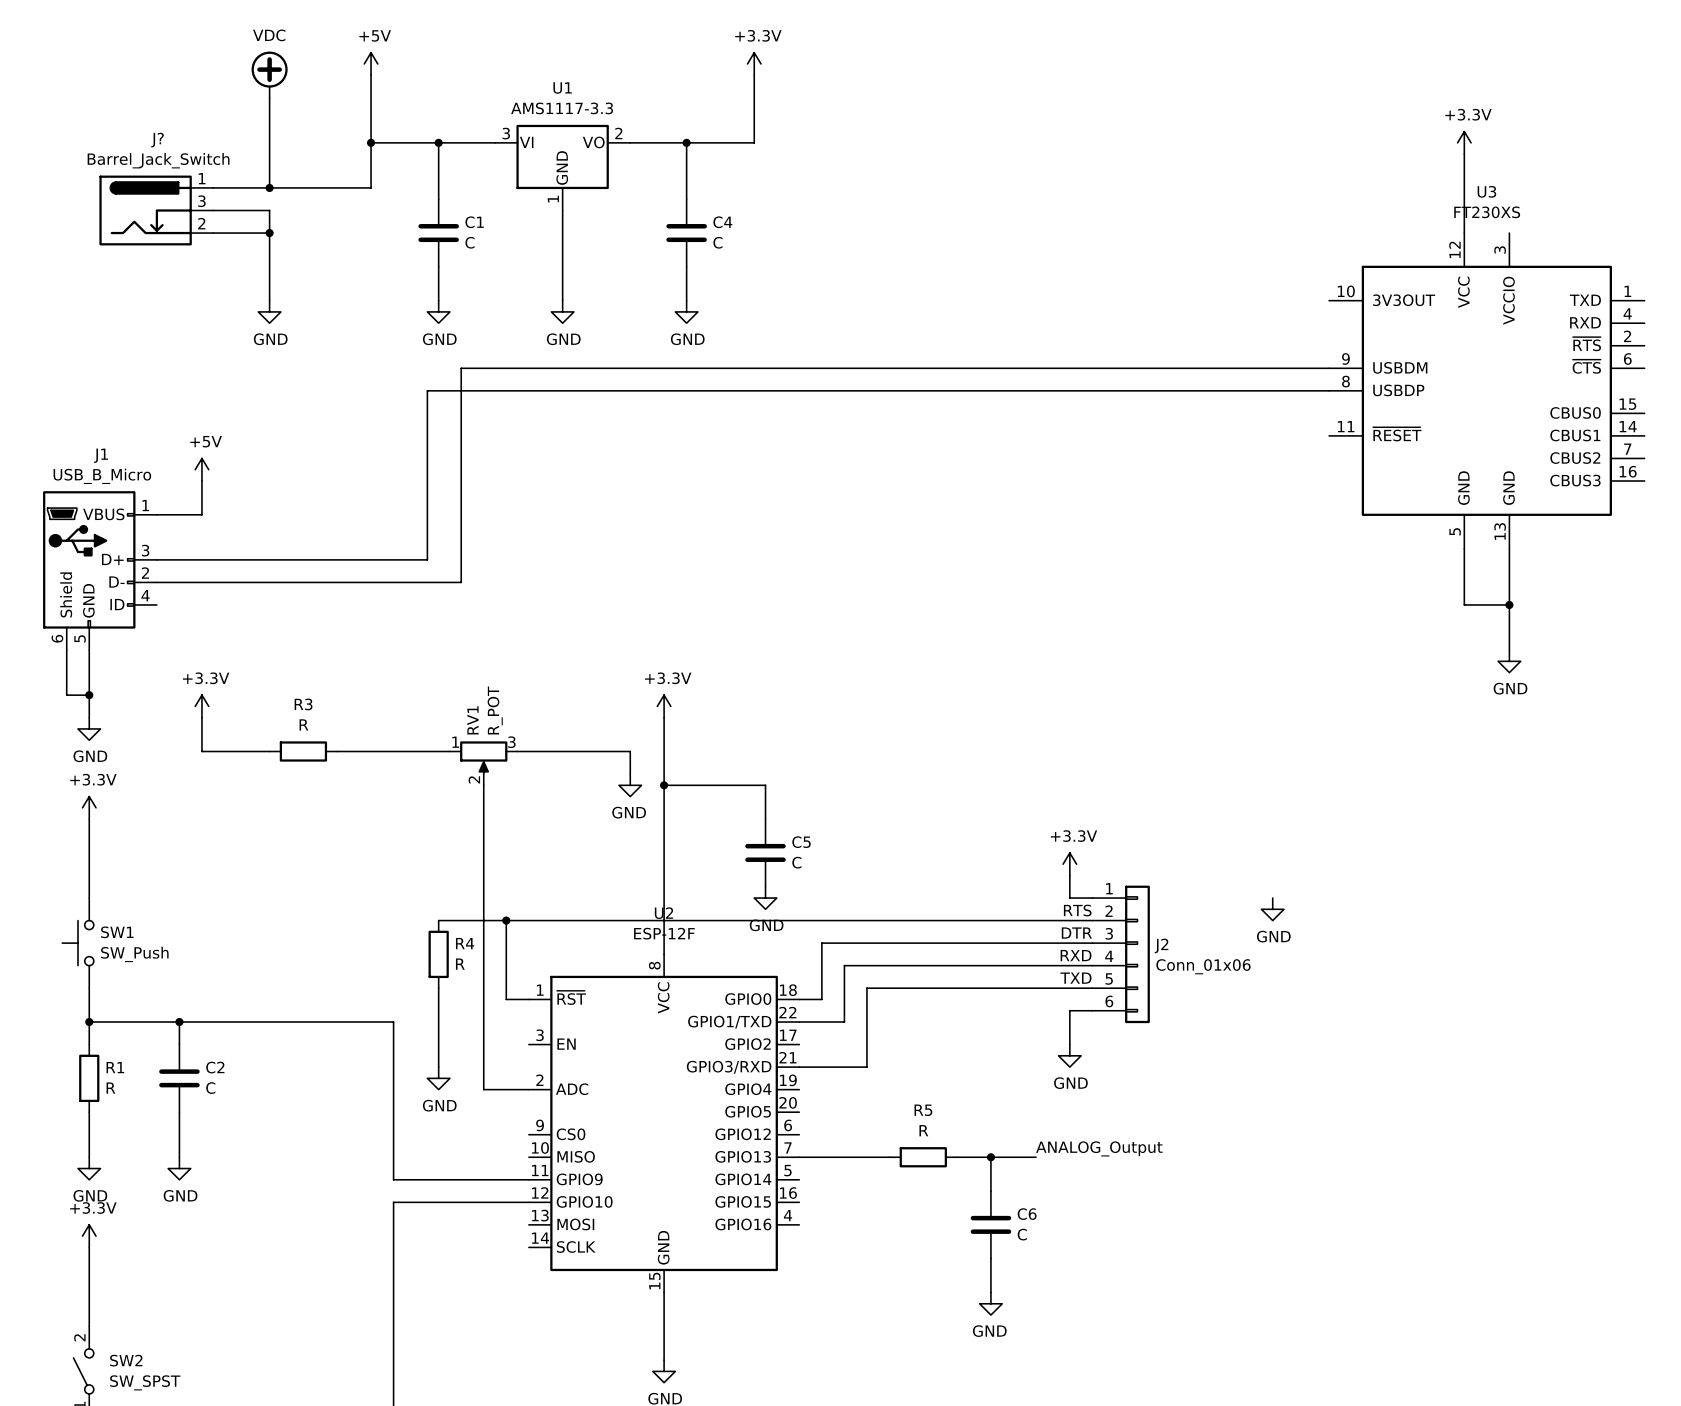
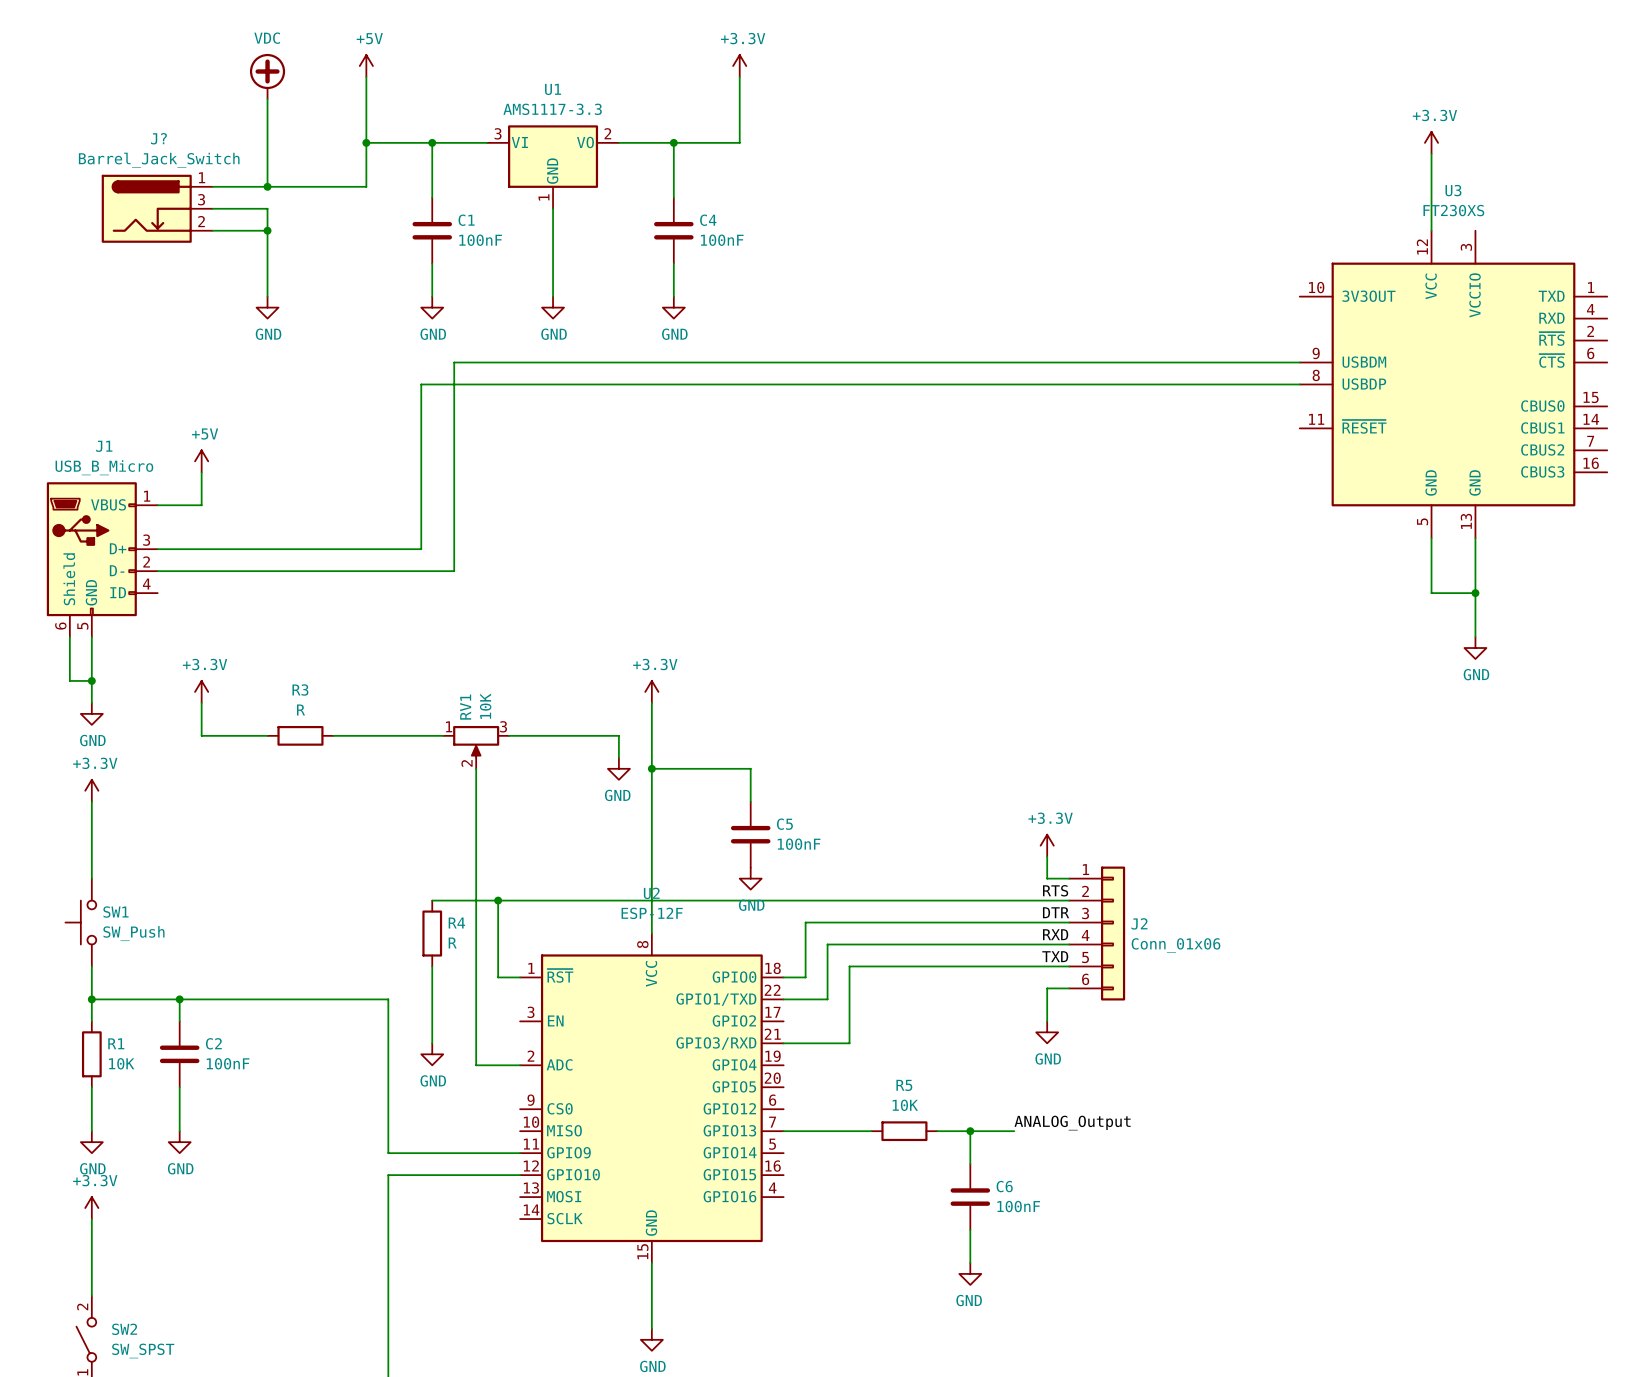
C1 value: C (470, 242) -> 100nF (480, 240)
C4 value: C (717, 242) -> 100nF (722, 240)
RV1 value: R_POT (495, 710) -> 10K (485, 706)
C5 value: C (796, 862) -> 100nF (799, 844)
power symbol: GND (1272, 909) -> none
R1 value: R (110, 1088) -> 10K (121, 1063)
C2 value: C (210, 1088) -> 100nF (228, 1063)
R5 value: R (923, 1130) -> 10K (905, 1105)
C6 value: C (1022, 1234) -> 100nF (1018, 1206)

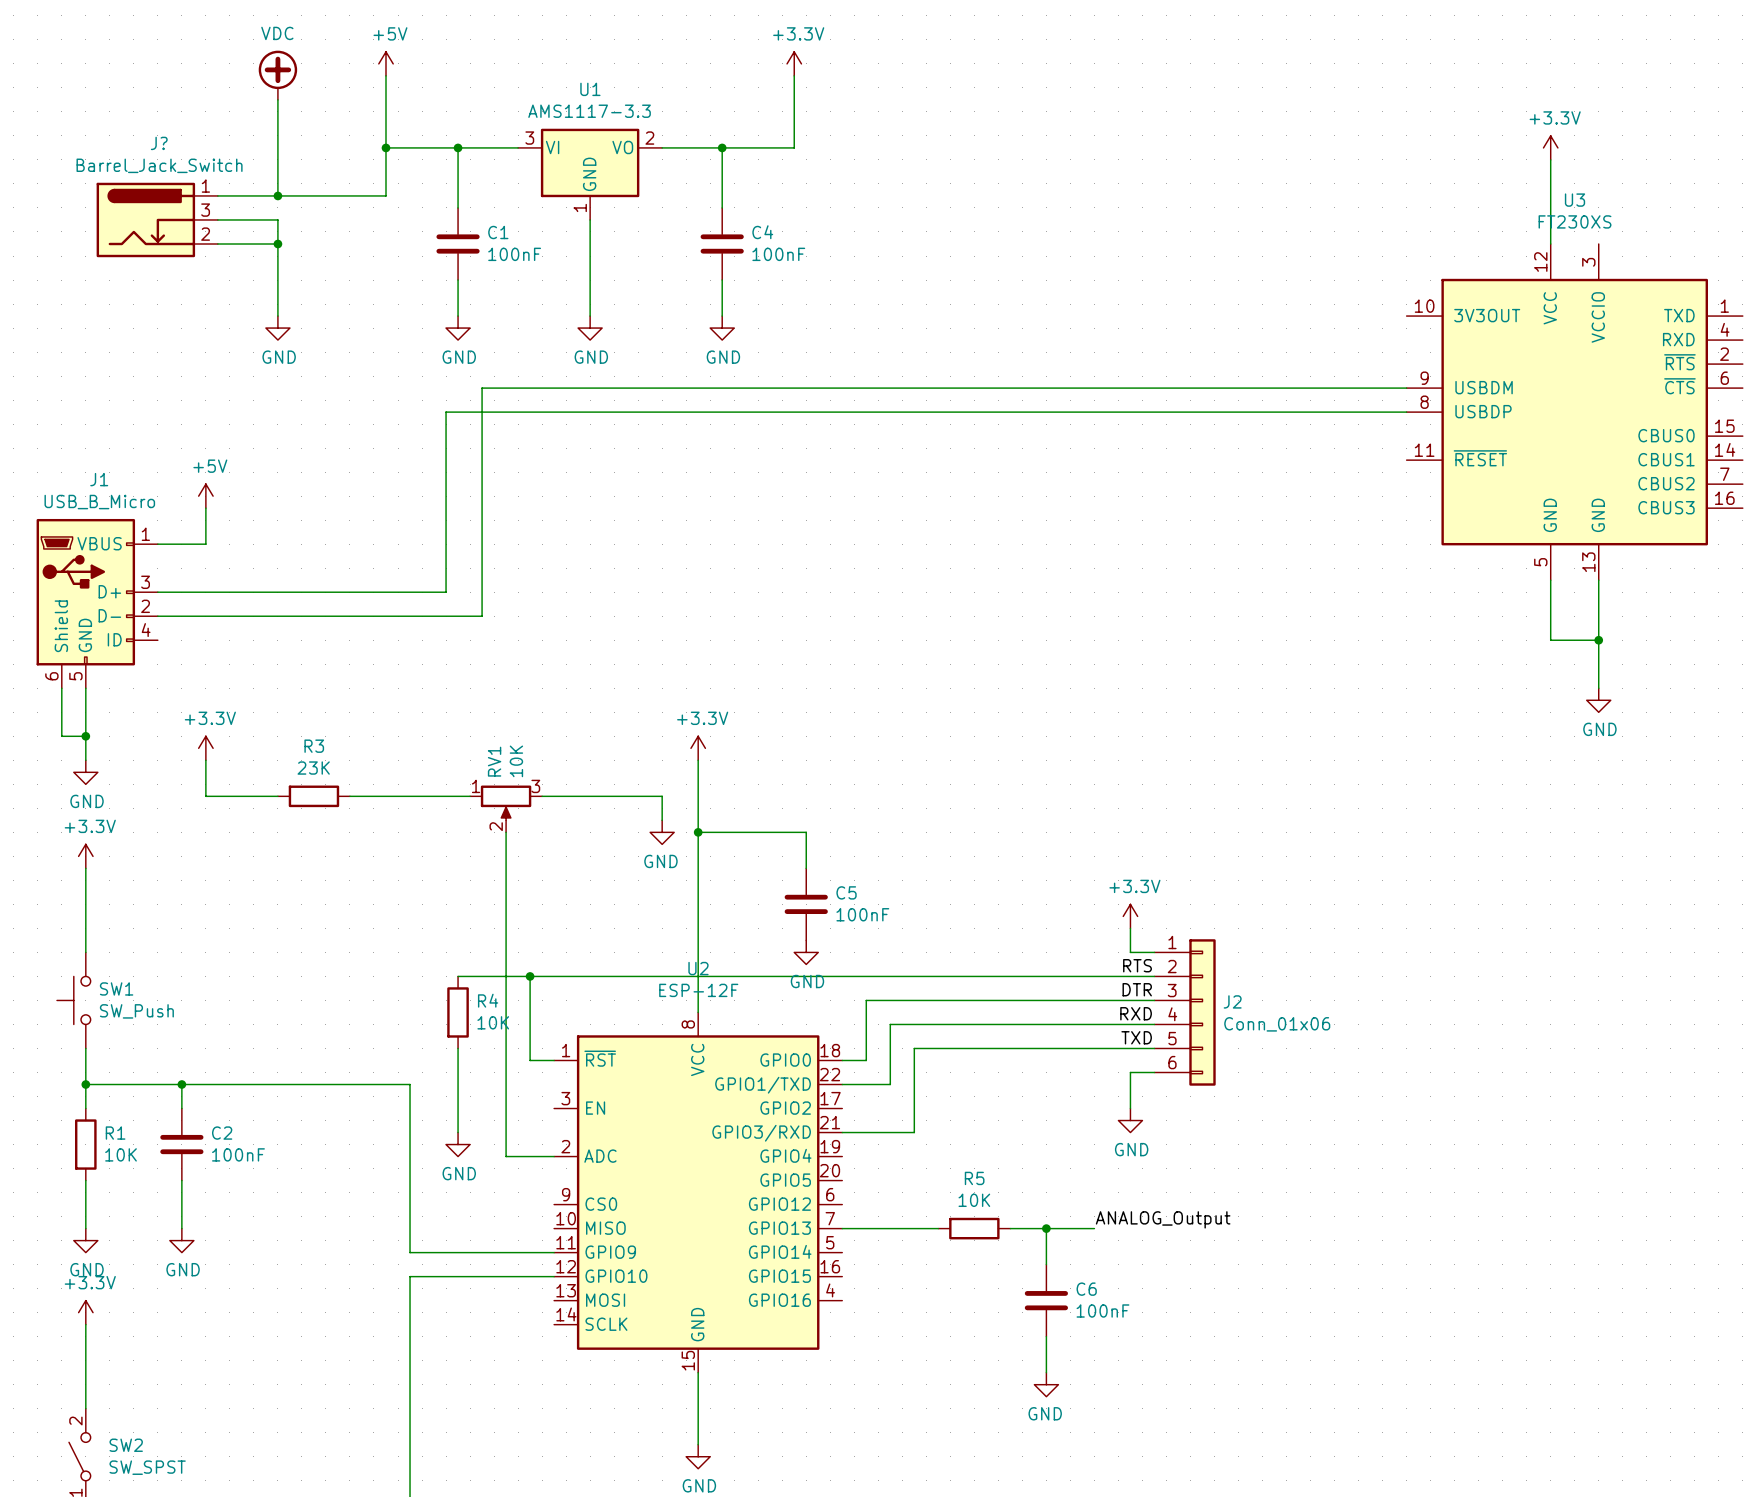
R3 value: R (301, 709) -> 23K (313, 768)
R4 value: R (452, 942) -> 10K (493, 1022)

